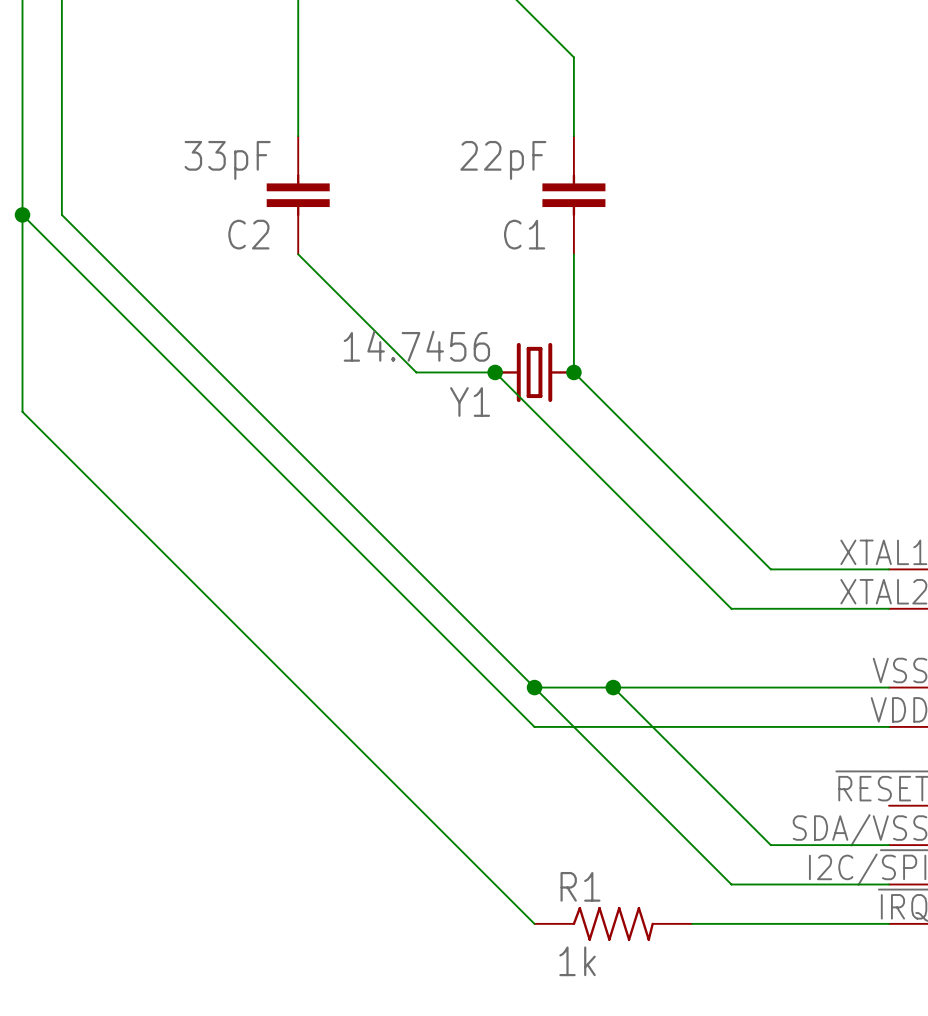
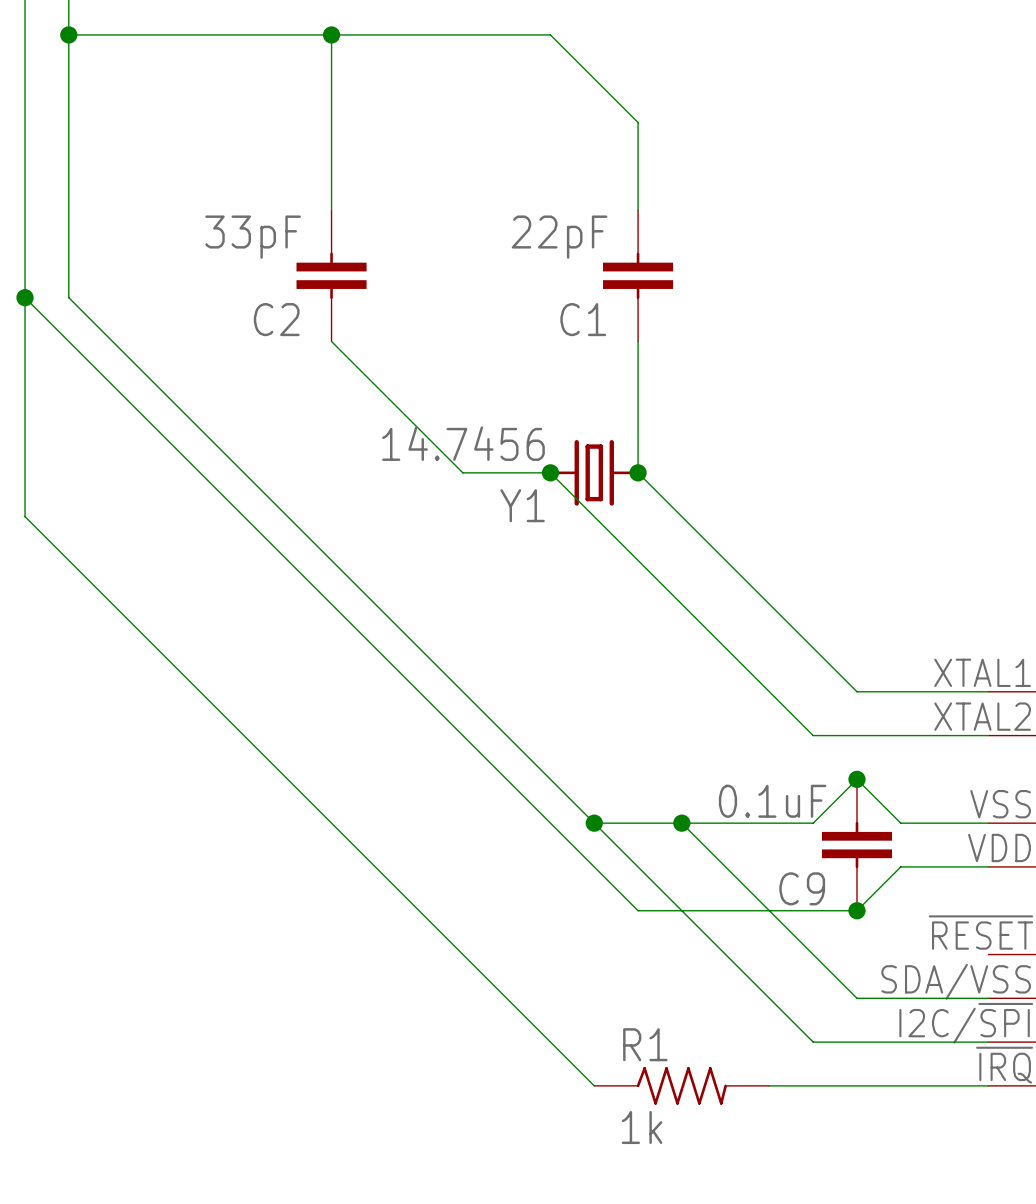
junction: none -> (857, 779)
wire: (731, 687) (810, 687) -> (813, 823) (857, 779) (900, 823)
C9: none -> 0.1uF (857, 845)
wire: (534, 726) (810, 726) -> (594, 866) (638, 910) (857, 910) (900, 866)
junction: none -> (857, 910)

